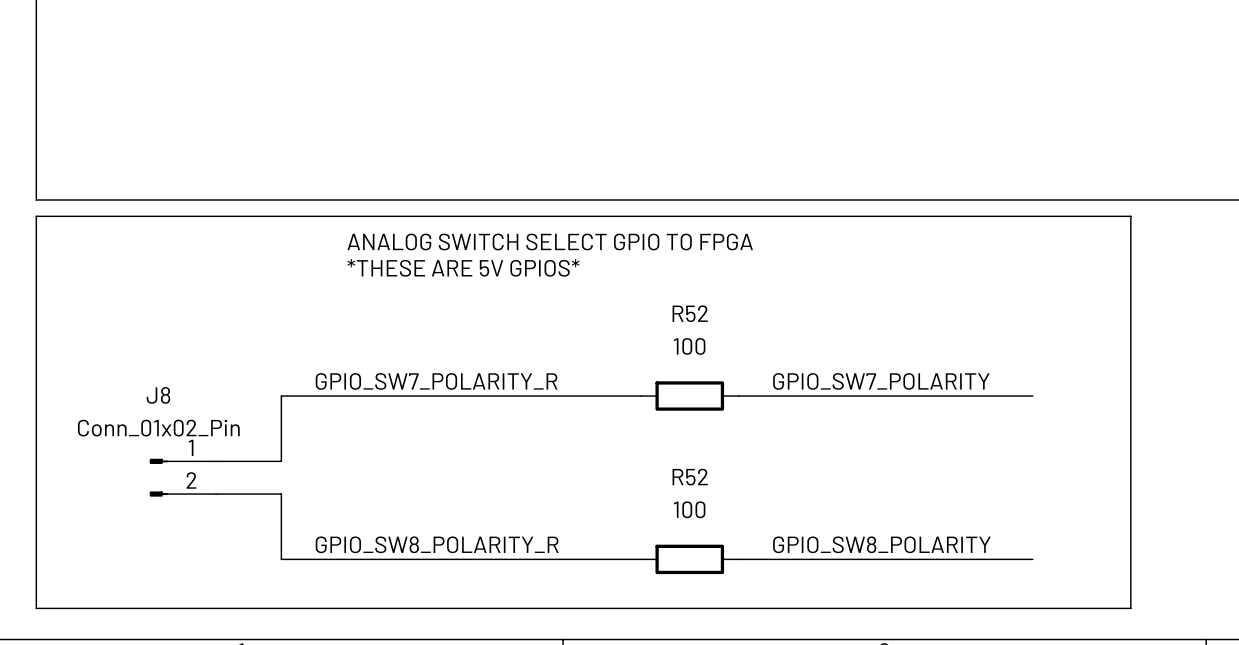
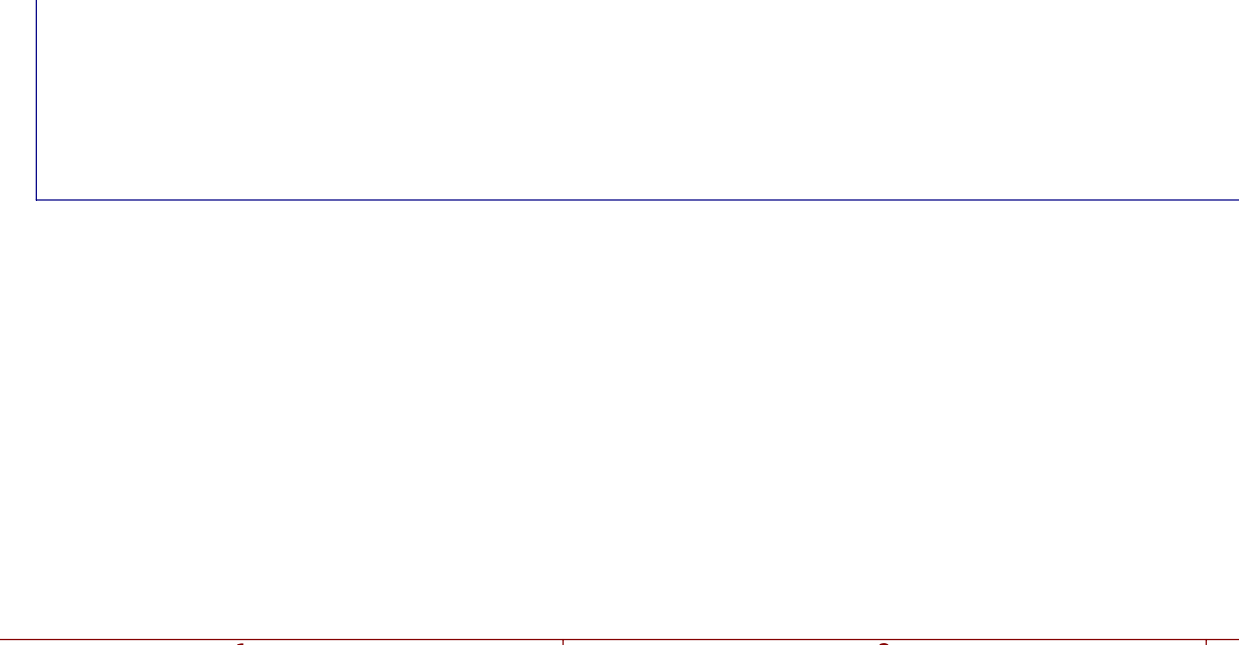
line: (36, 216) (1130, 216) (1130, 608) (36, 608) (36, 216) -> none
text: ANALOG SWITCH SELECT GPIO TO FPGA (550, 242) -> none
text: *THESE ARE 5V GPIOS* (463, 267) -> none
label: GPIO_SW7_POLARITY_R (436, 381) -> none
label: GPIO_SW7_POLARITY (881, 381) -> none
wire: (640, 396) (281, 396) (281, 461) (216, 461) -> none
R52: 100 (689, 396) -> none
wire: (738, 396) (1032, 396) -> none
J8: Conn_01x02_Pin (182, 477) -> none
wire: (216, 494) (281, 494) (281, 559) (640, 559) -> none
label: GPIO_SW8_POLARITY_R (437, 544) -> none
label: GPIO_SW8_POLARITY (881, 544) -> none
R52: 100 (689, 559) -> none
wire: (738, 559) (1032, 559) -> none

